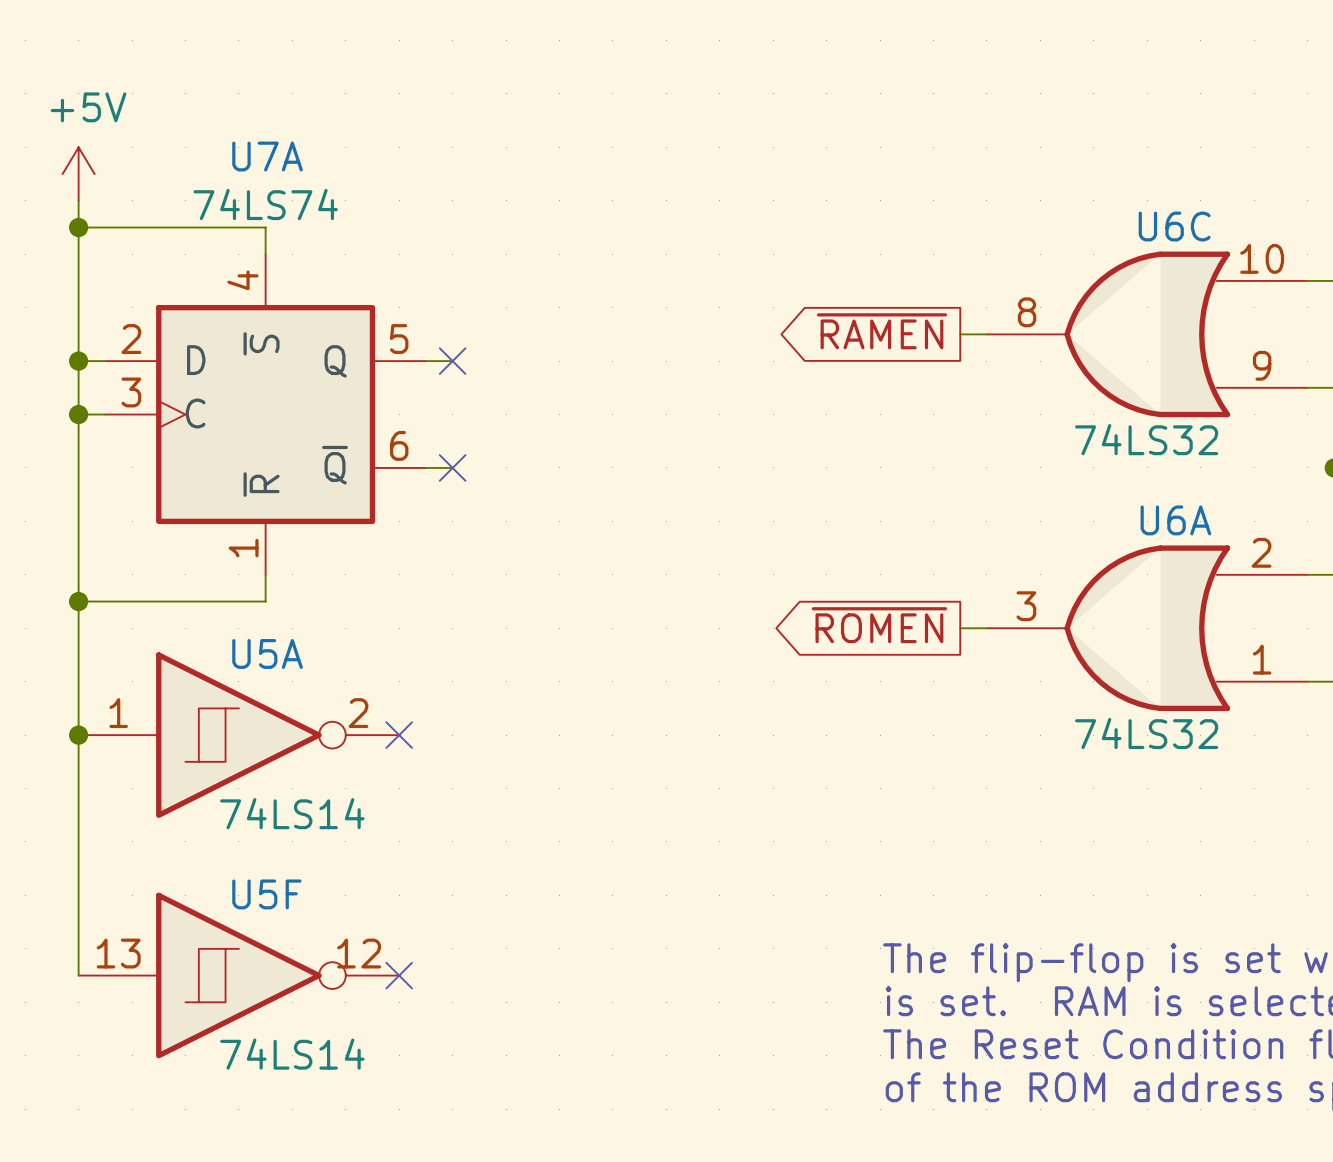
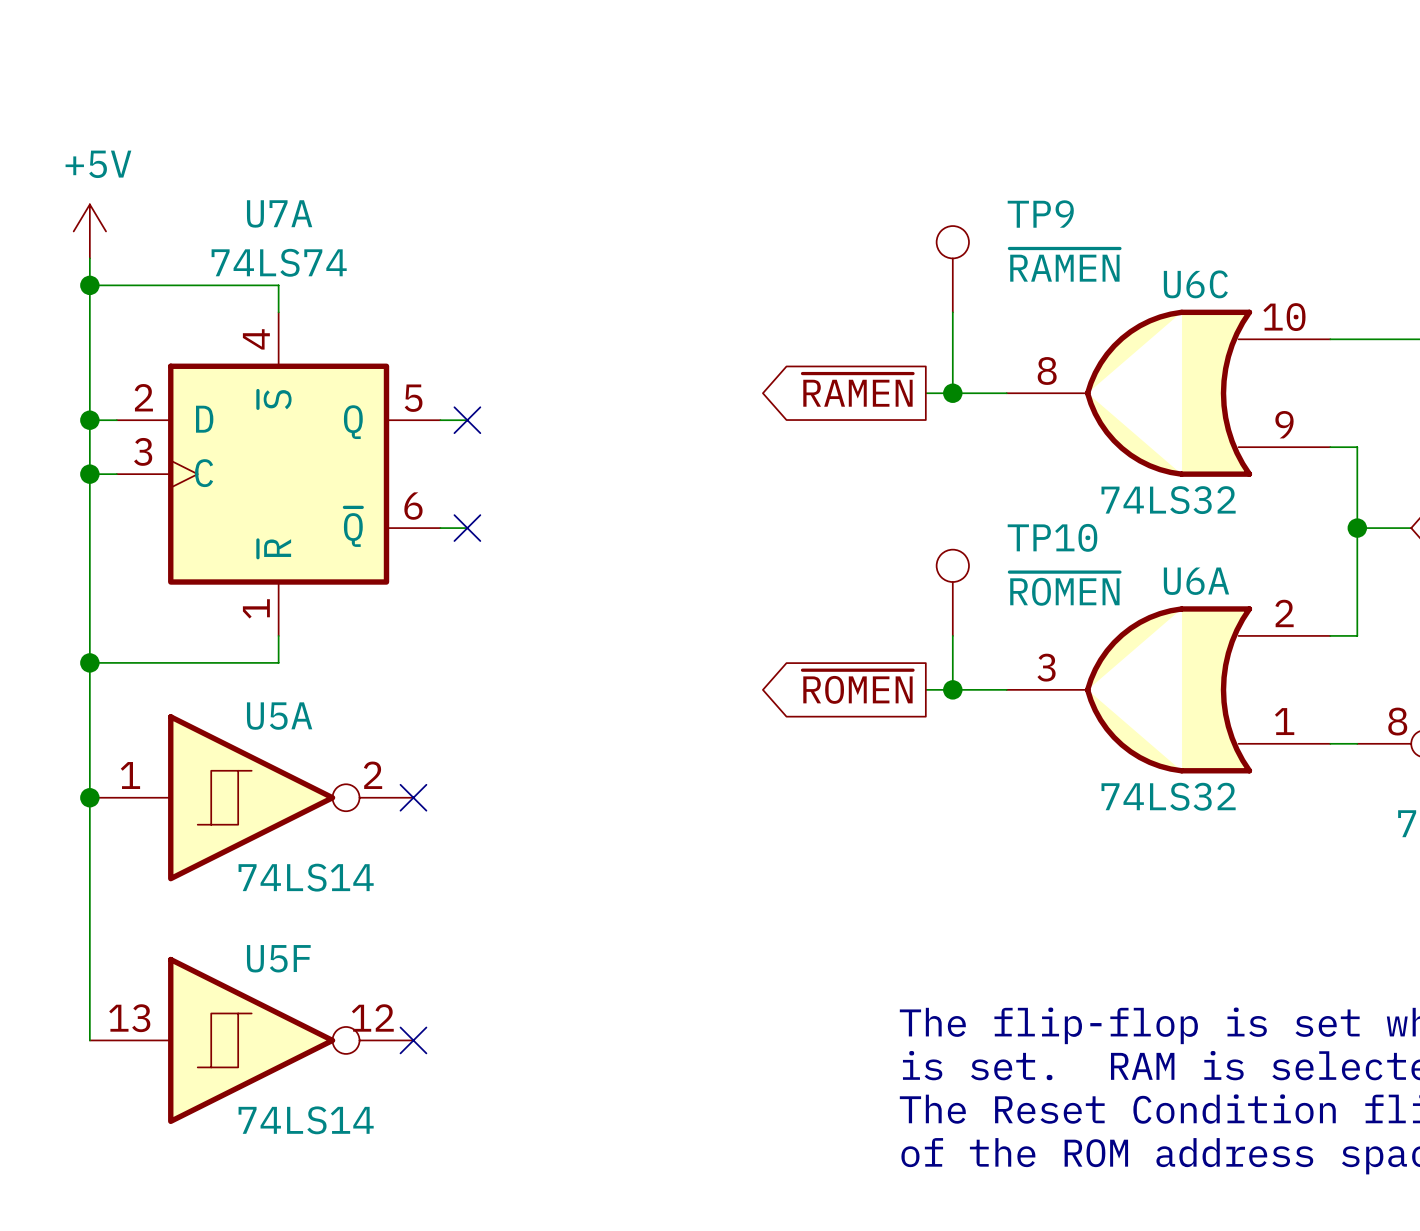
TP9: none -> ~{RAMEN} (952, 269)
wire: none -> (952, 312) (952, 393)
global label position: ~{RAMEN} (881, 331) -> ~{RAMEN} (857, 390)
wire: none -> (925, 393) (979, 393)
junction: none -> (952, 393)
TP10: none -> ~{ROMEN} (952, 592)
wire: none -> (952, 635) (952, 689)
global label position: ~{ROMEN} (879, 625) -> ~{ROMEN} (857, 687)
wire: none -> (925, 689) (979, 689)
junction: none -> (952, 689)

